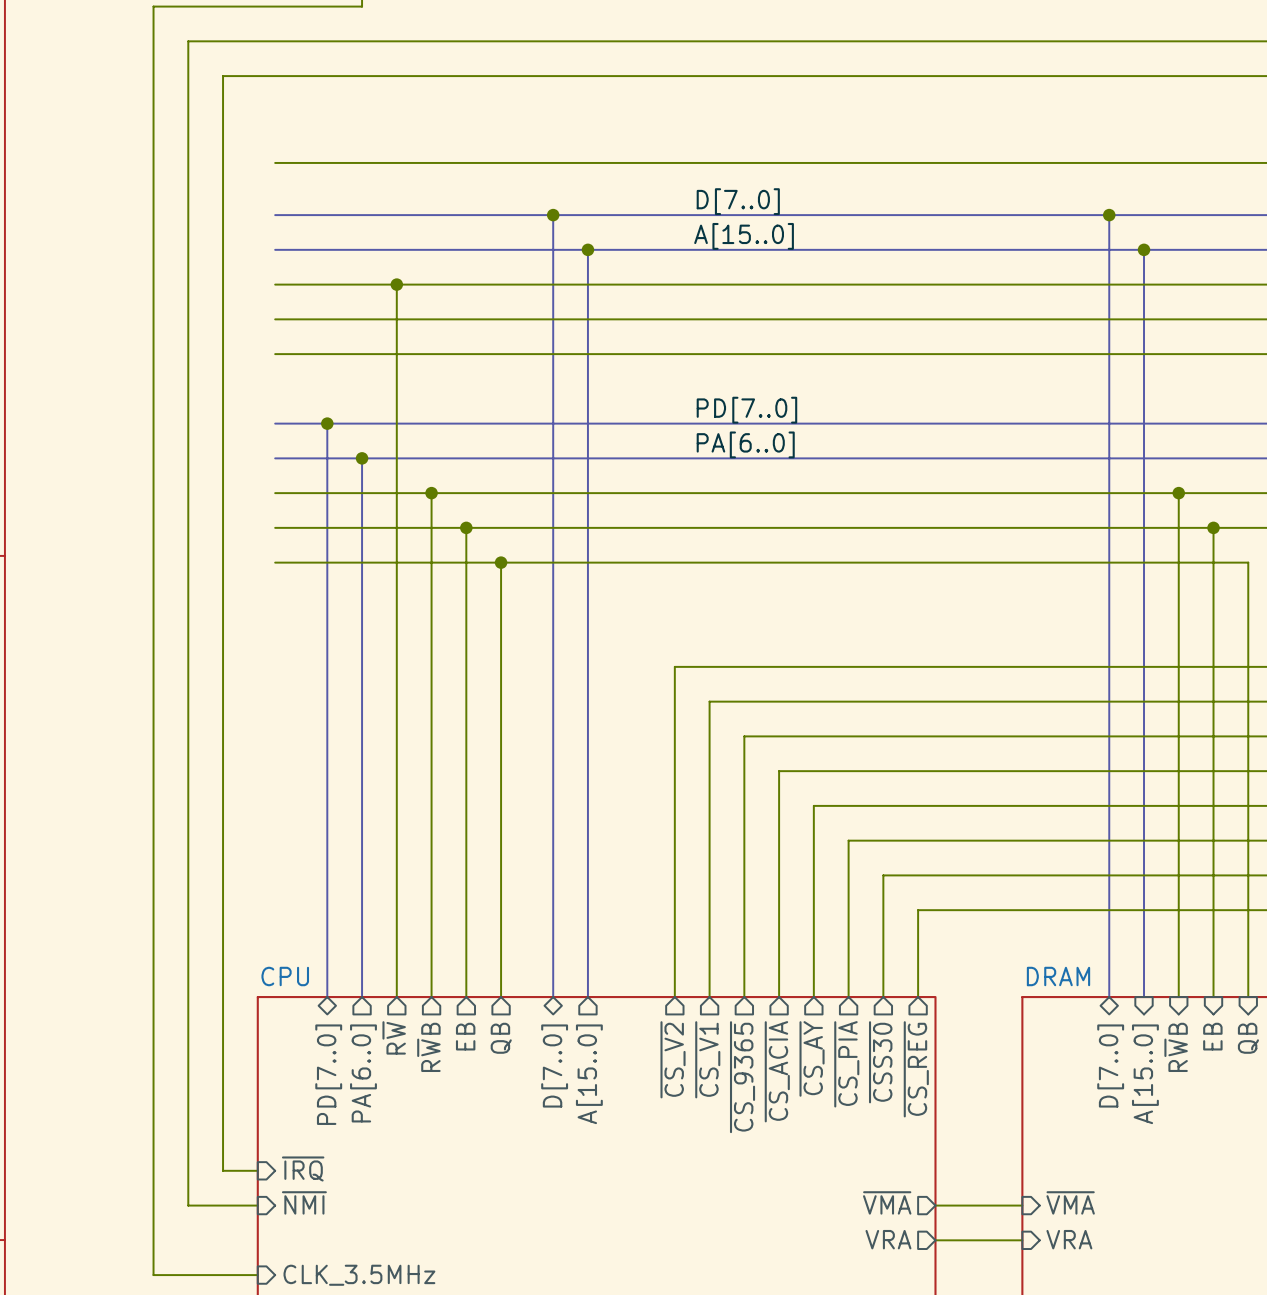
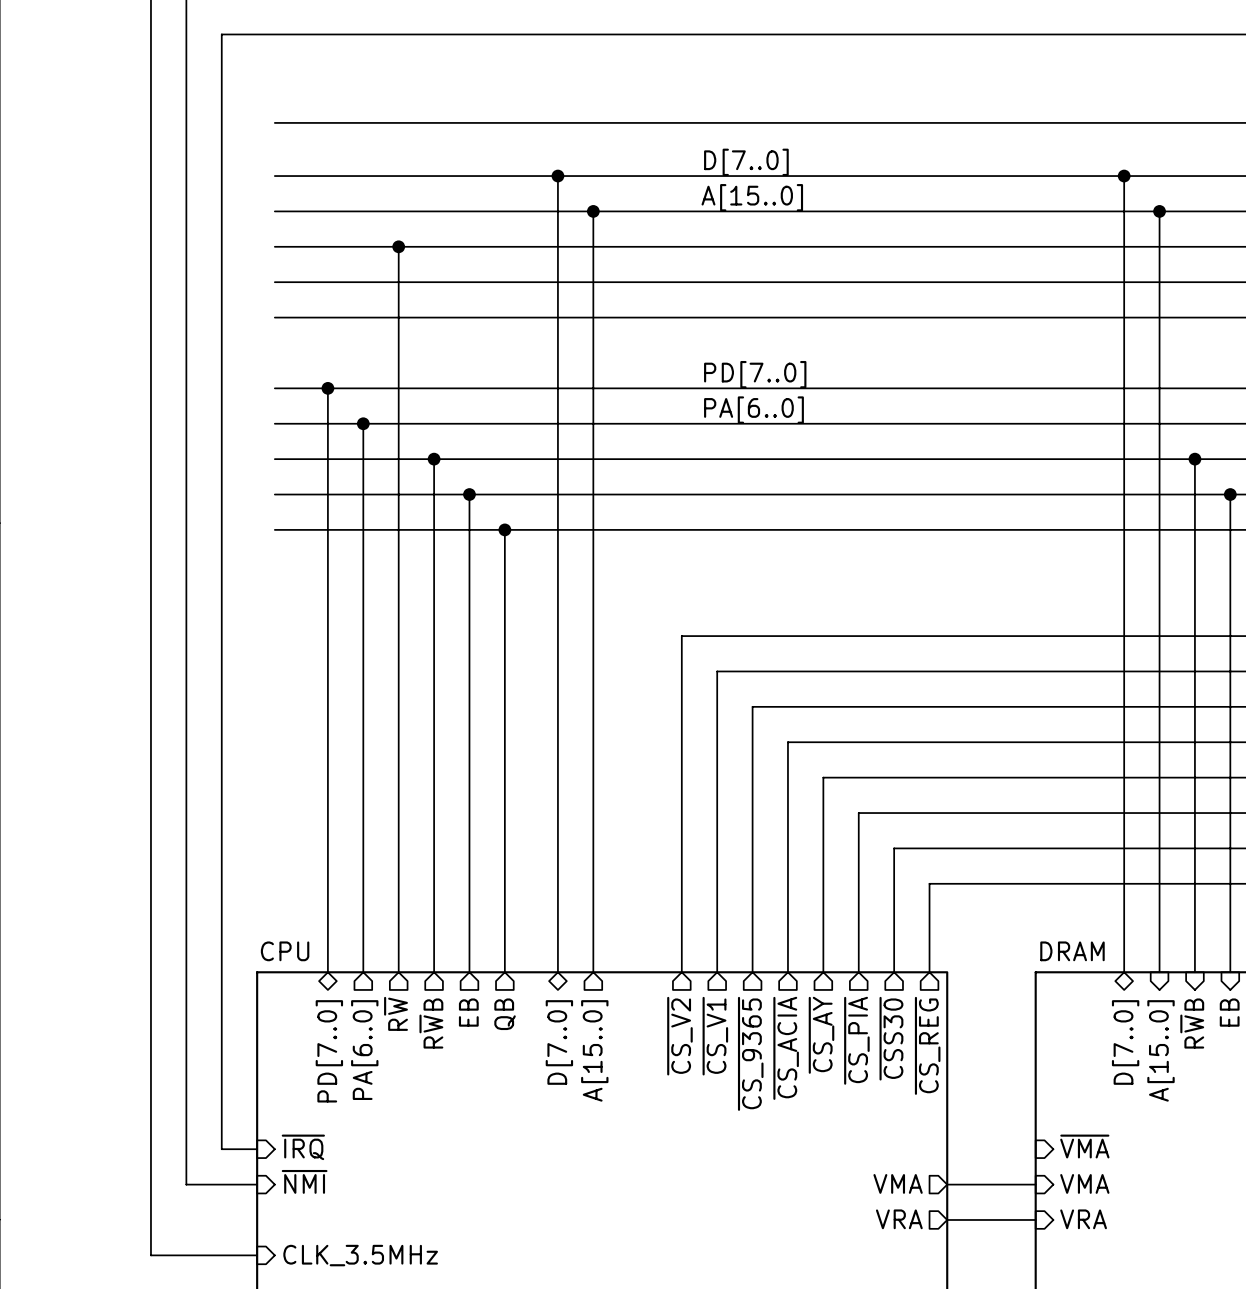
sheet pin: none -> ~{VMA} (1084, 1146)
sheet pin: ~{VMA} (887, 1202) -> VMA (898, 1183)
sheet pin: ~{VMA} (1070, 1202) -> VMA (1084, 1183)

